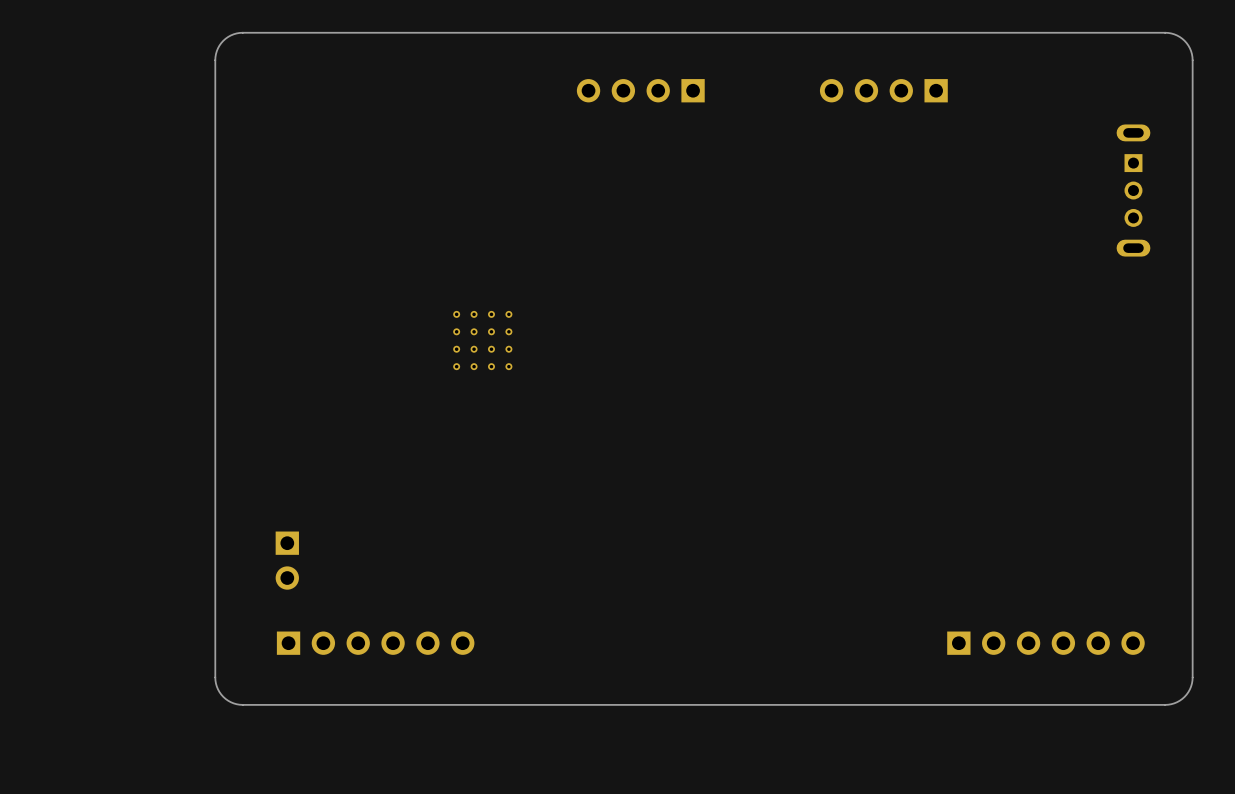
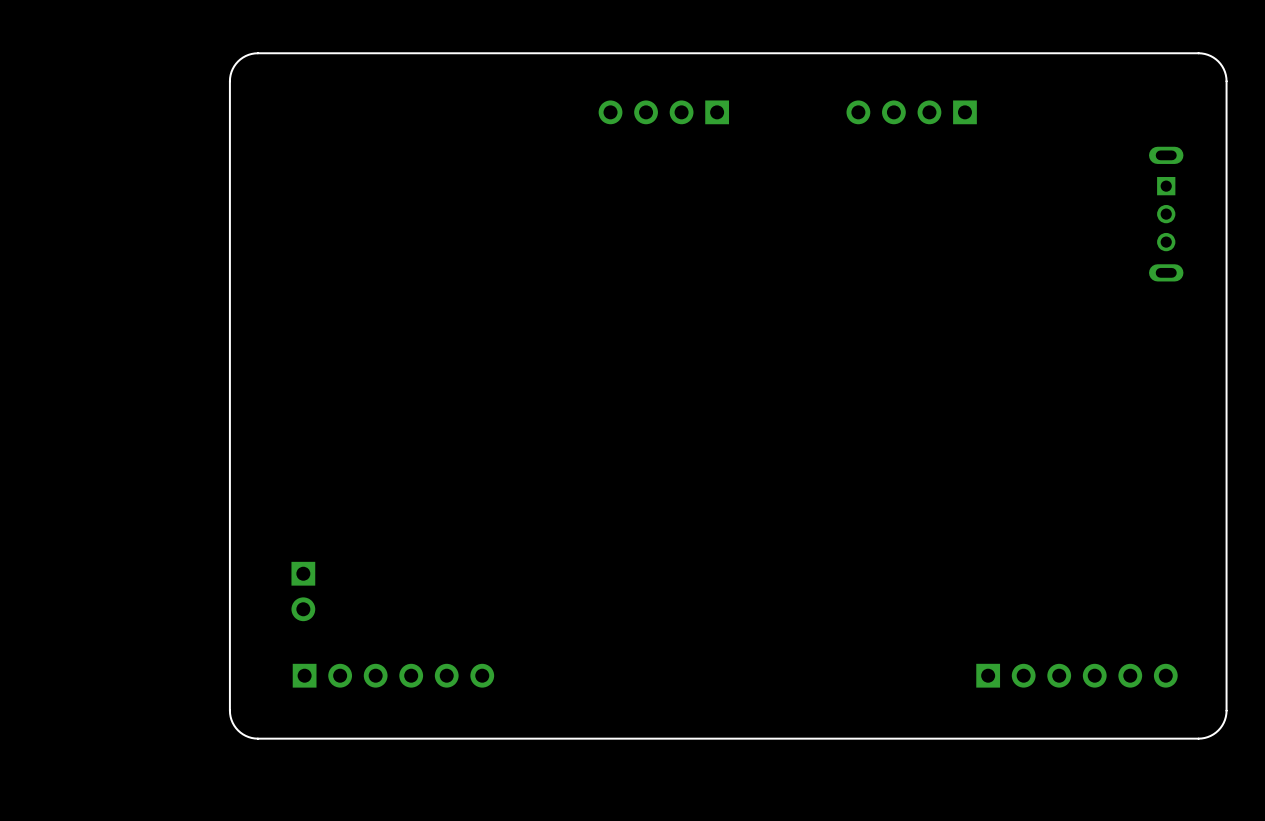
part: (482, 340) -> none

